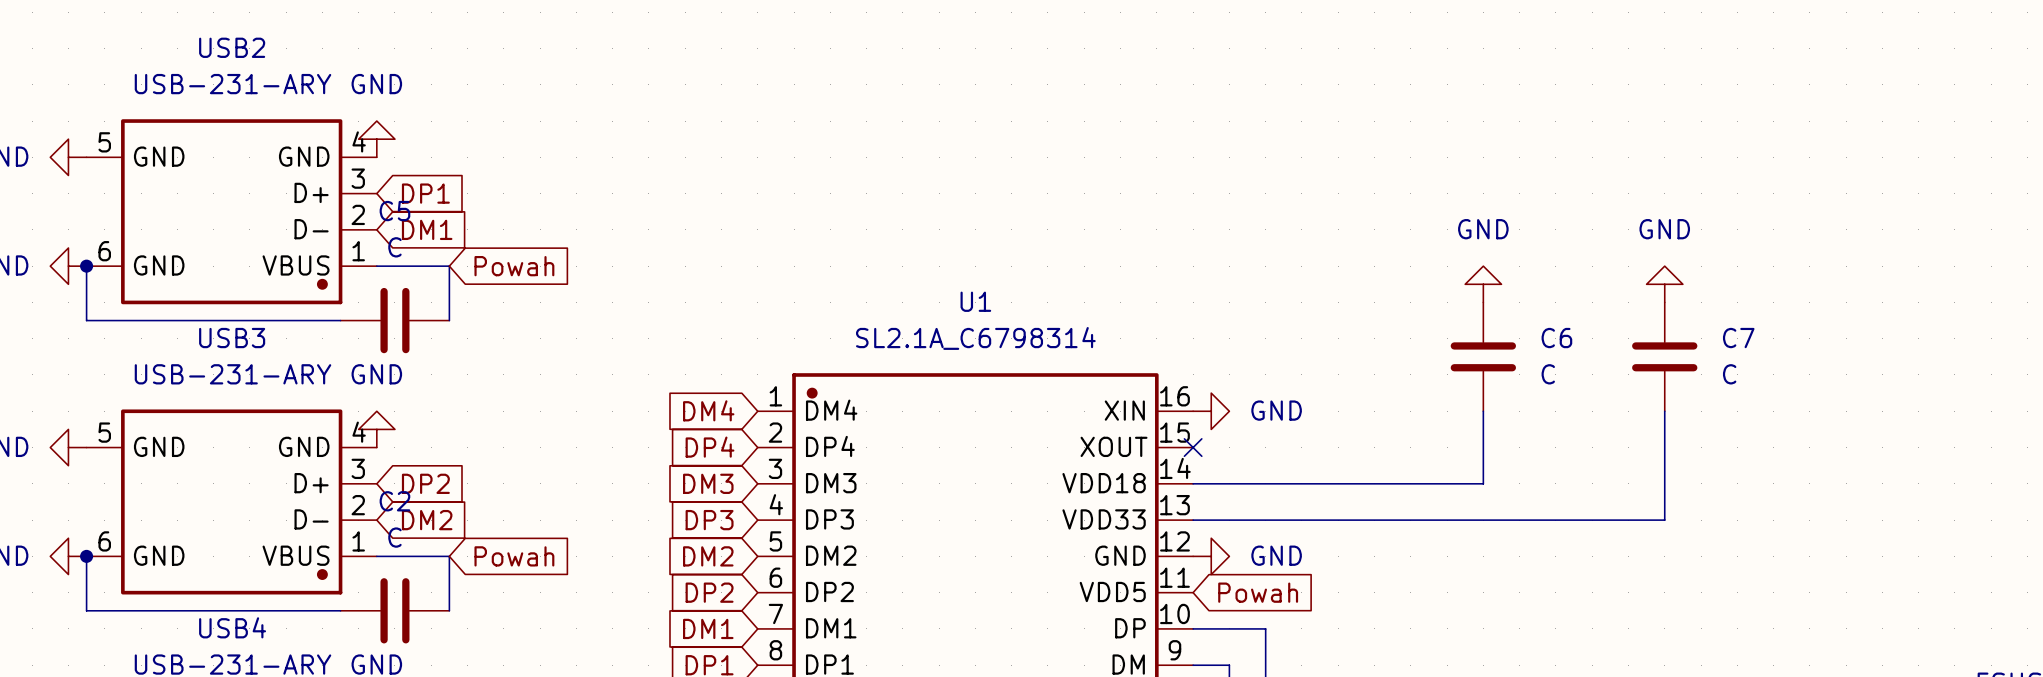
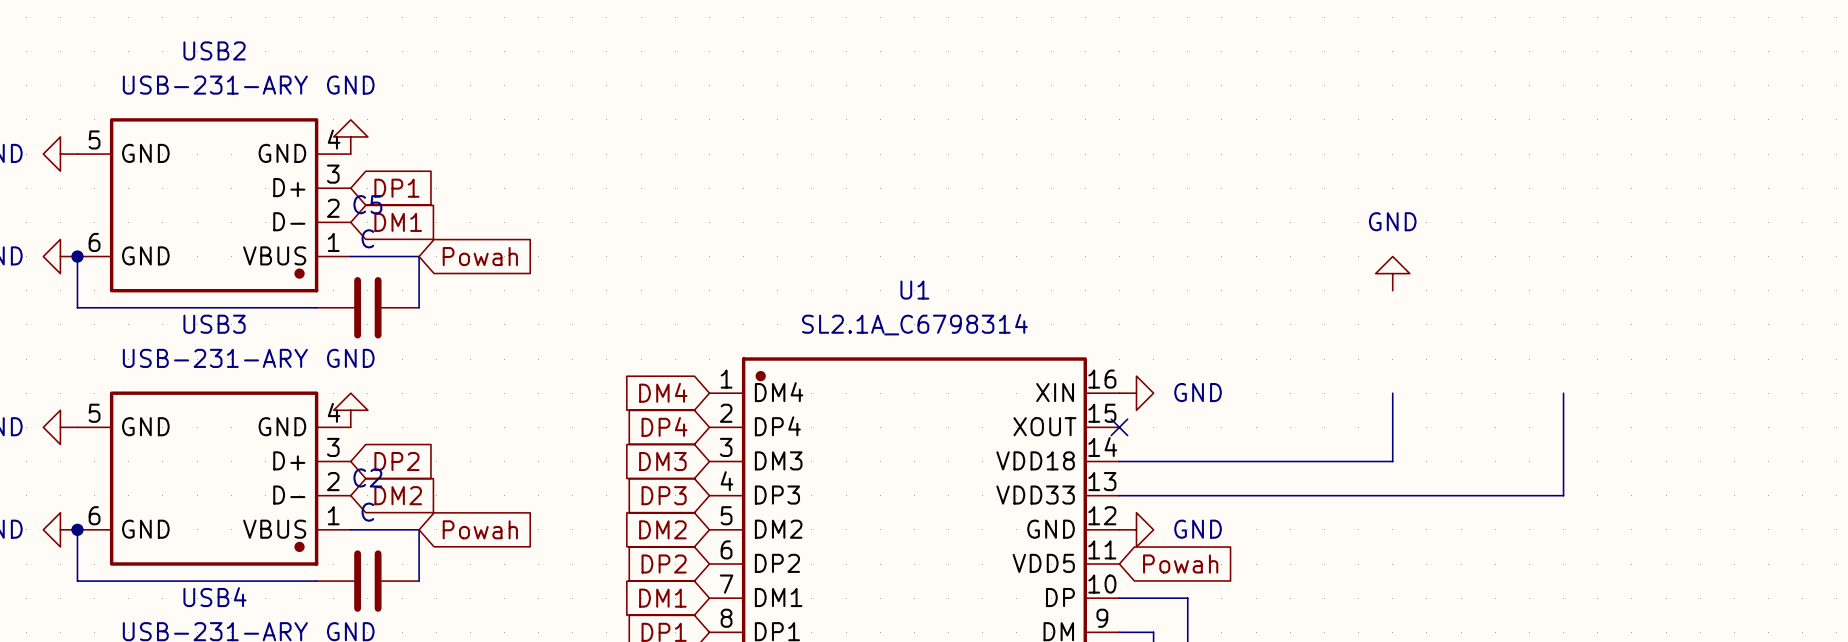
power symbol: GND (1664, 284) -> none
C6: C (1483, 356) -> none
C7: C (1664, 356) -> none

